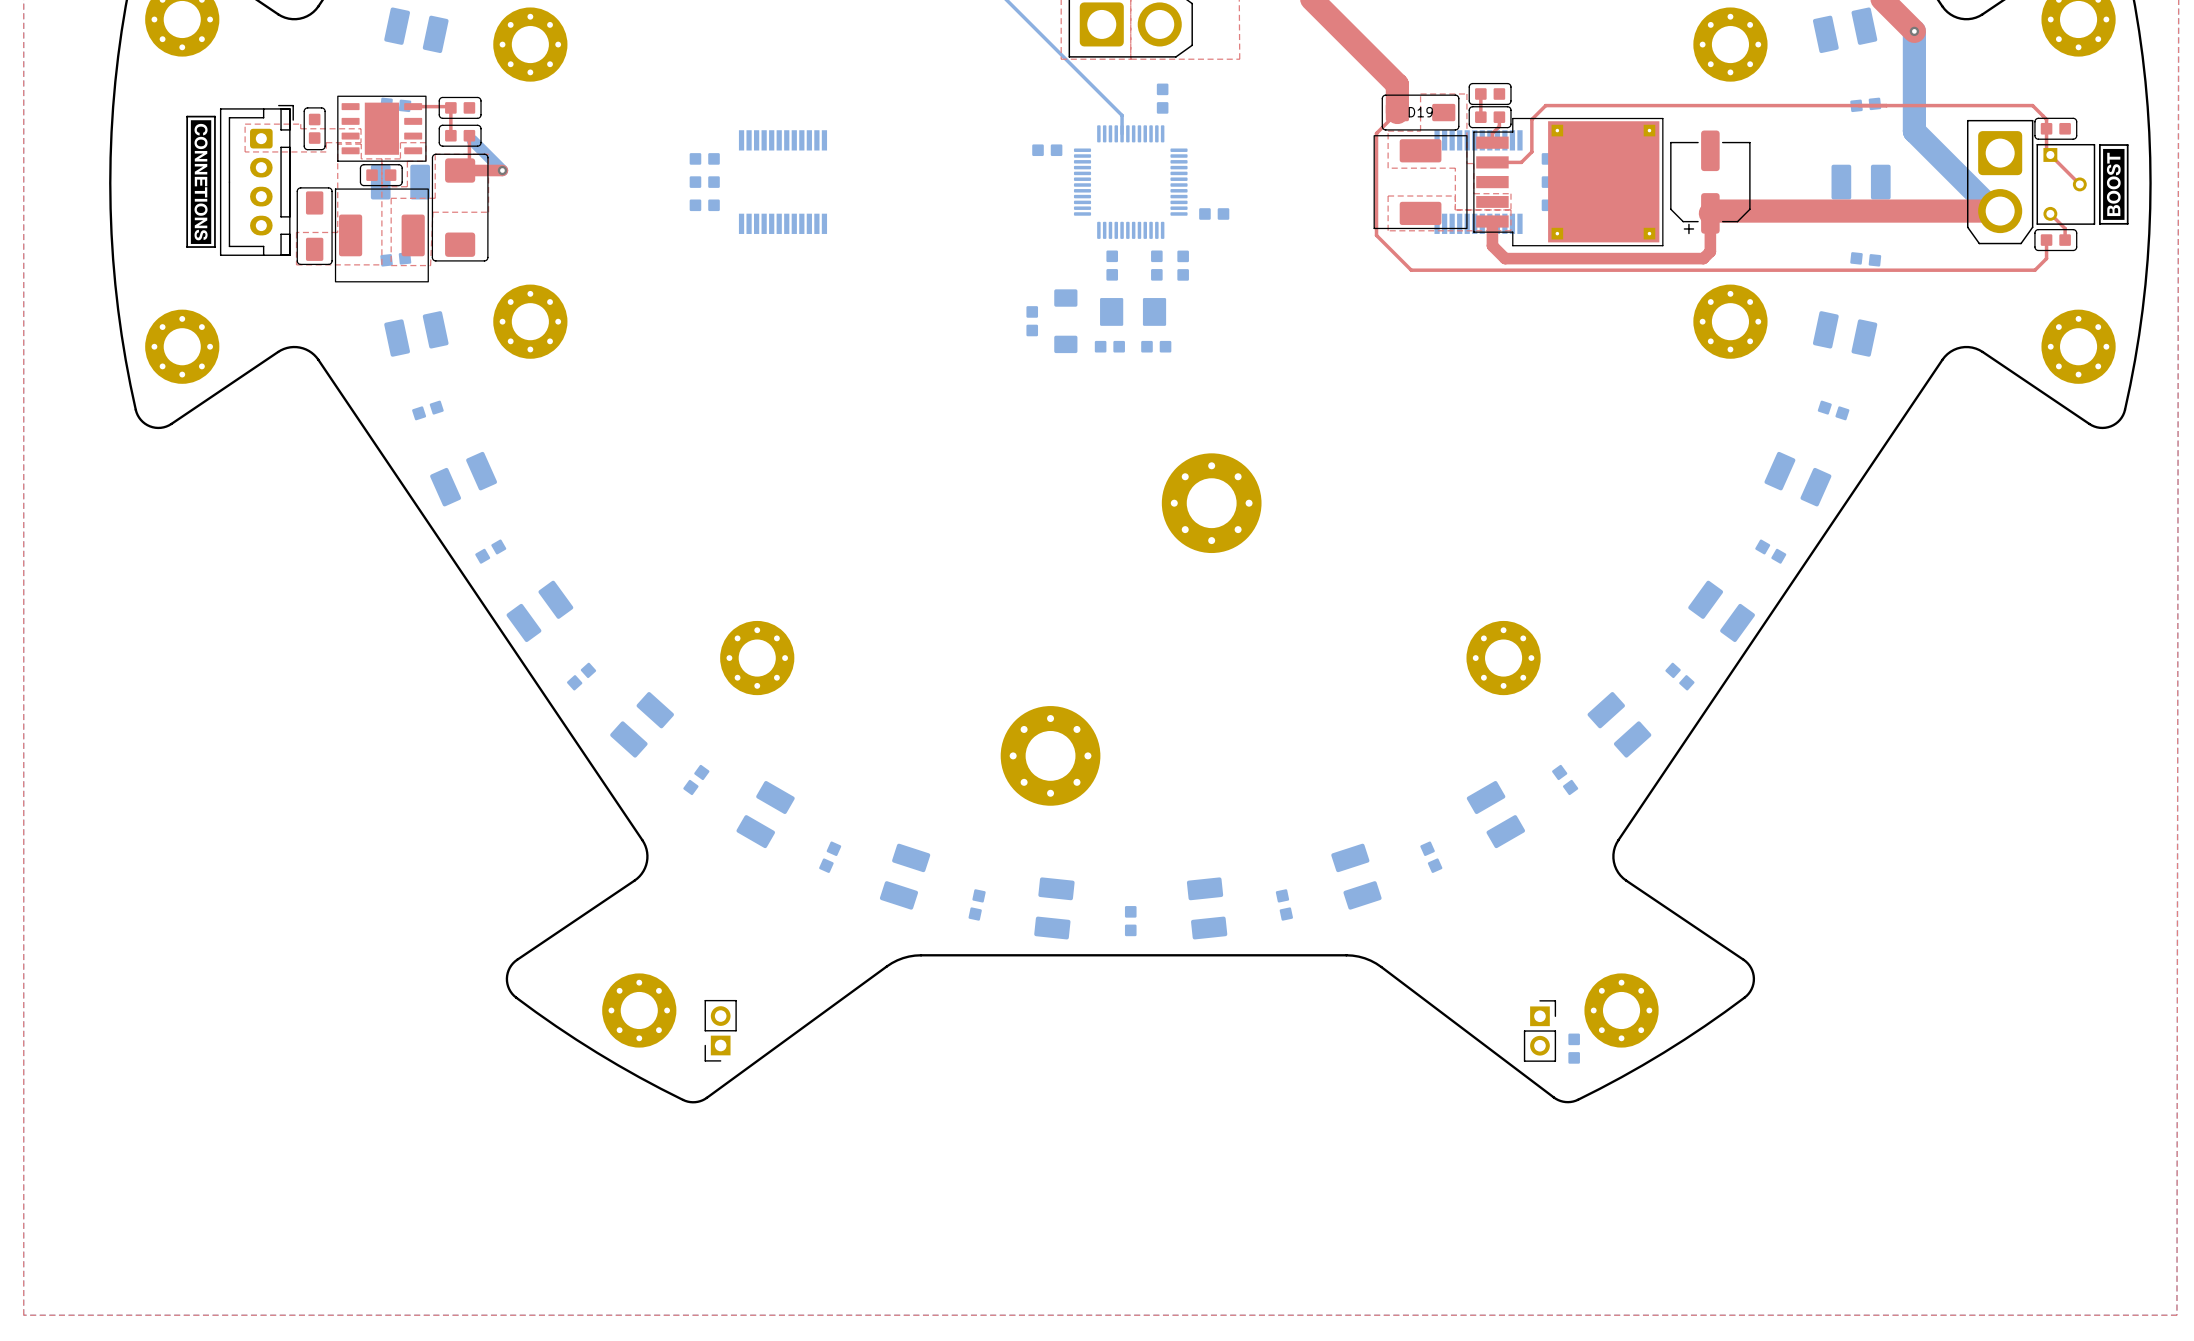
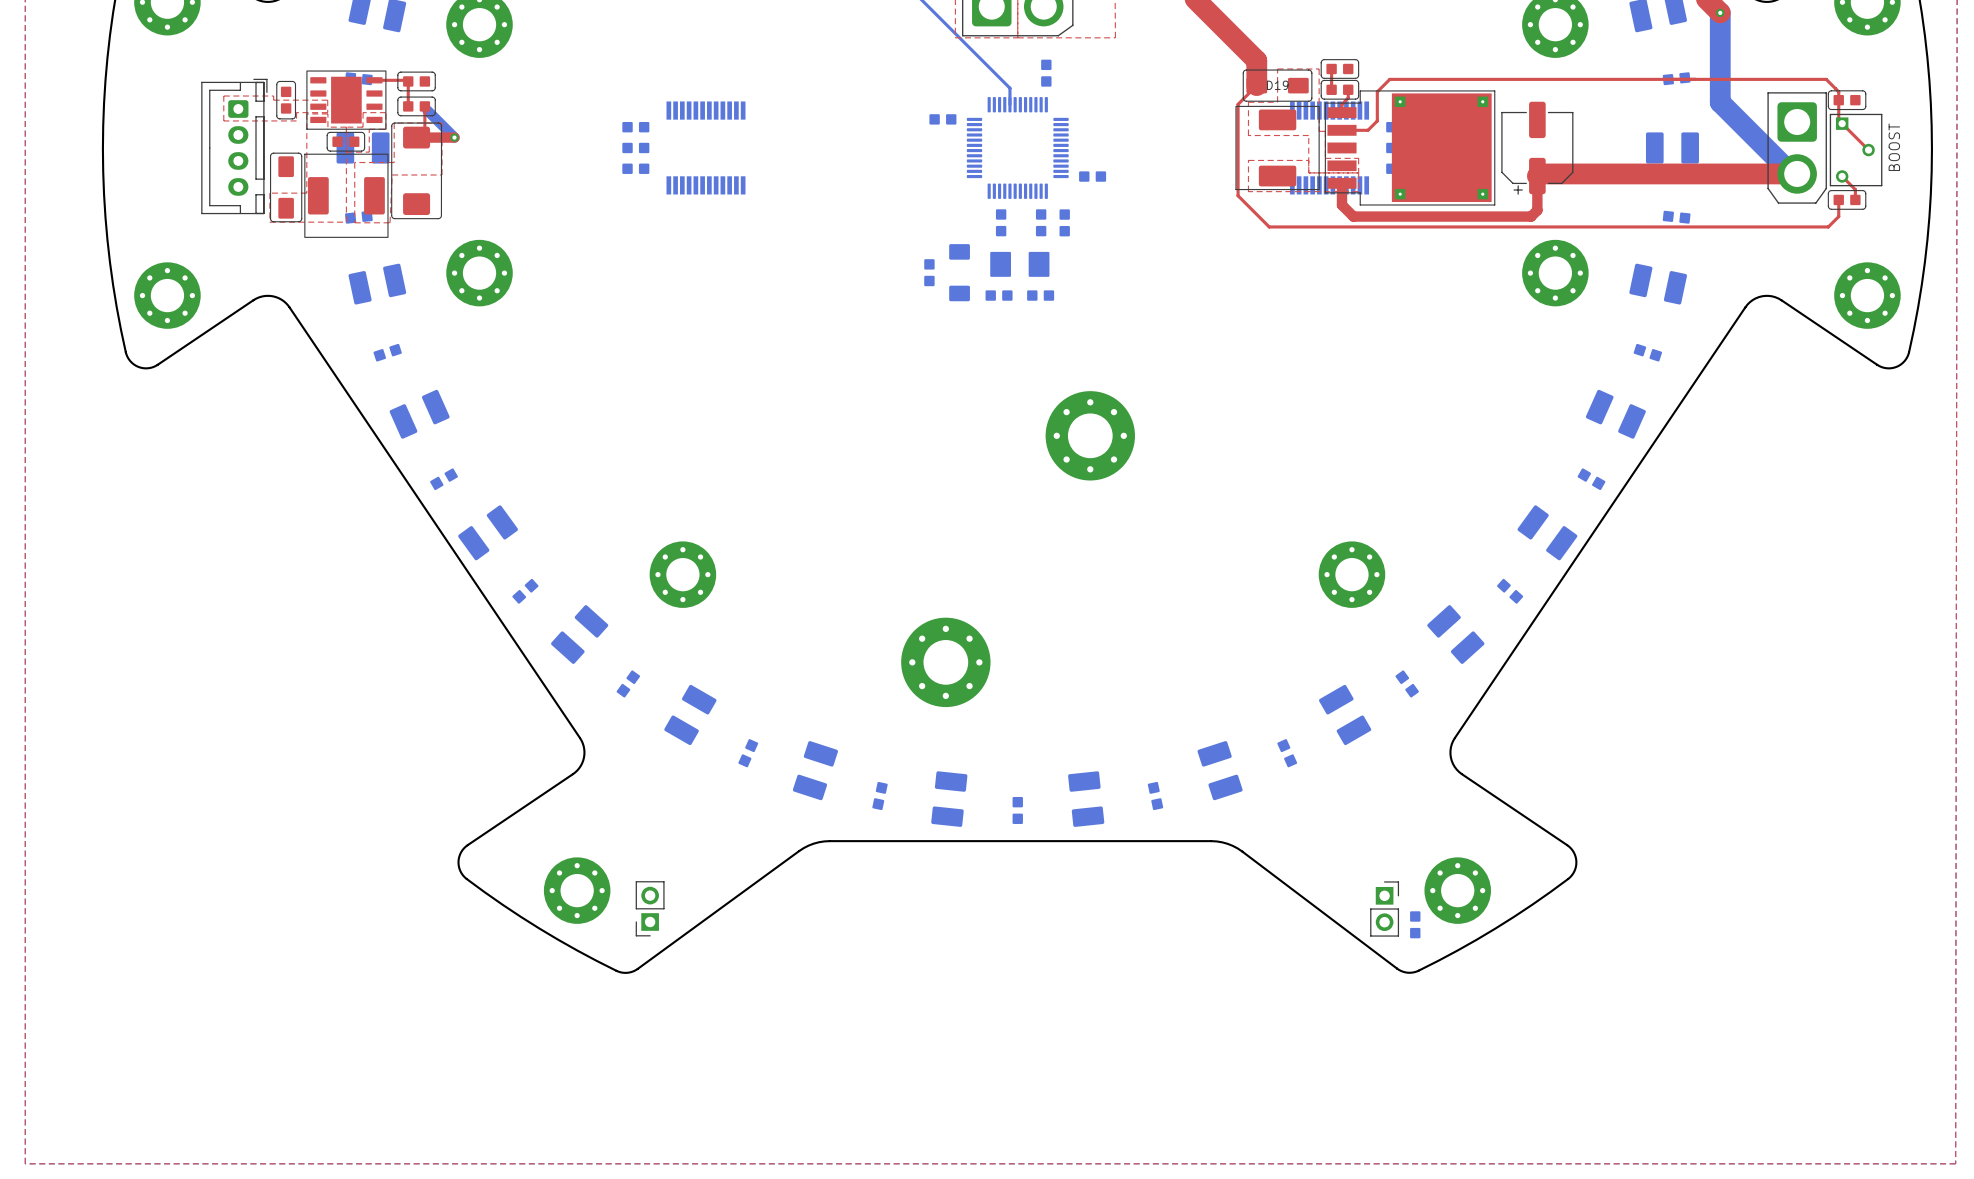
line: (187, 116) (187, 247) (214, 247) (214, 116) (187, 116) -> none
drawing: [190, 120, 212, 244] -> none
line: (2099, 145) (2127, 145) (2127, 223) (2099, 223) (2099, 145) -> none
drawing: [2103, 148, 2125, 220] -> none
text: none -> BOOST (1894, 147)

